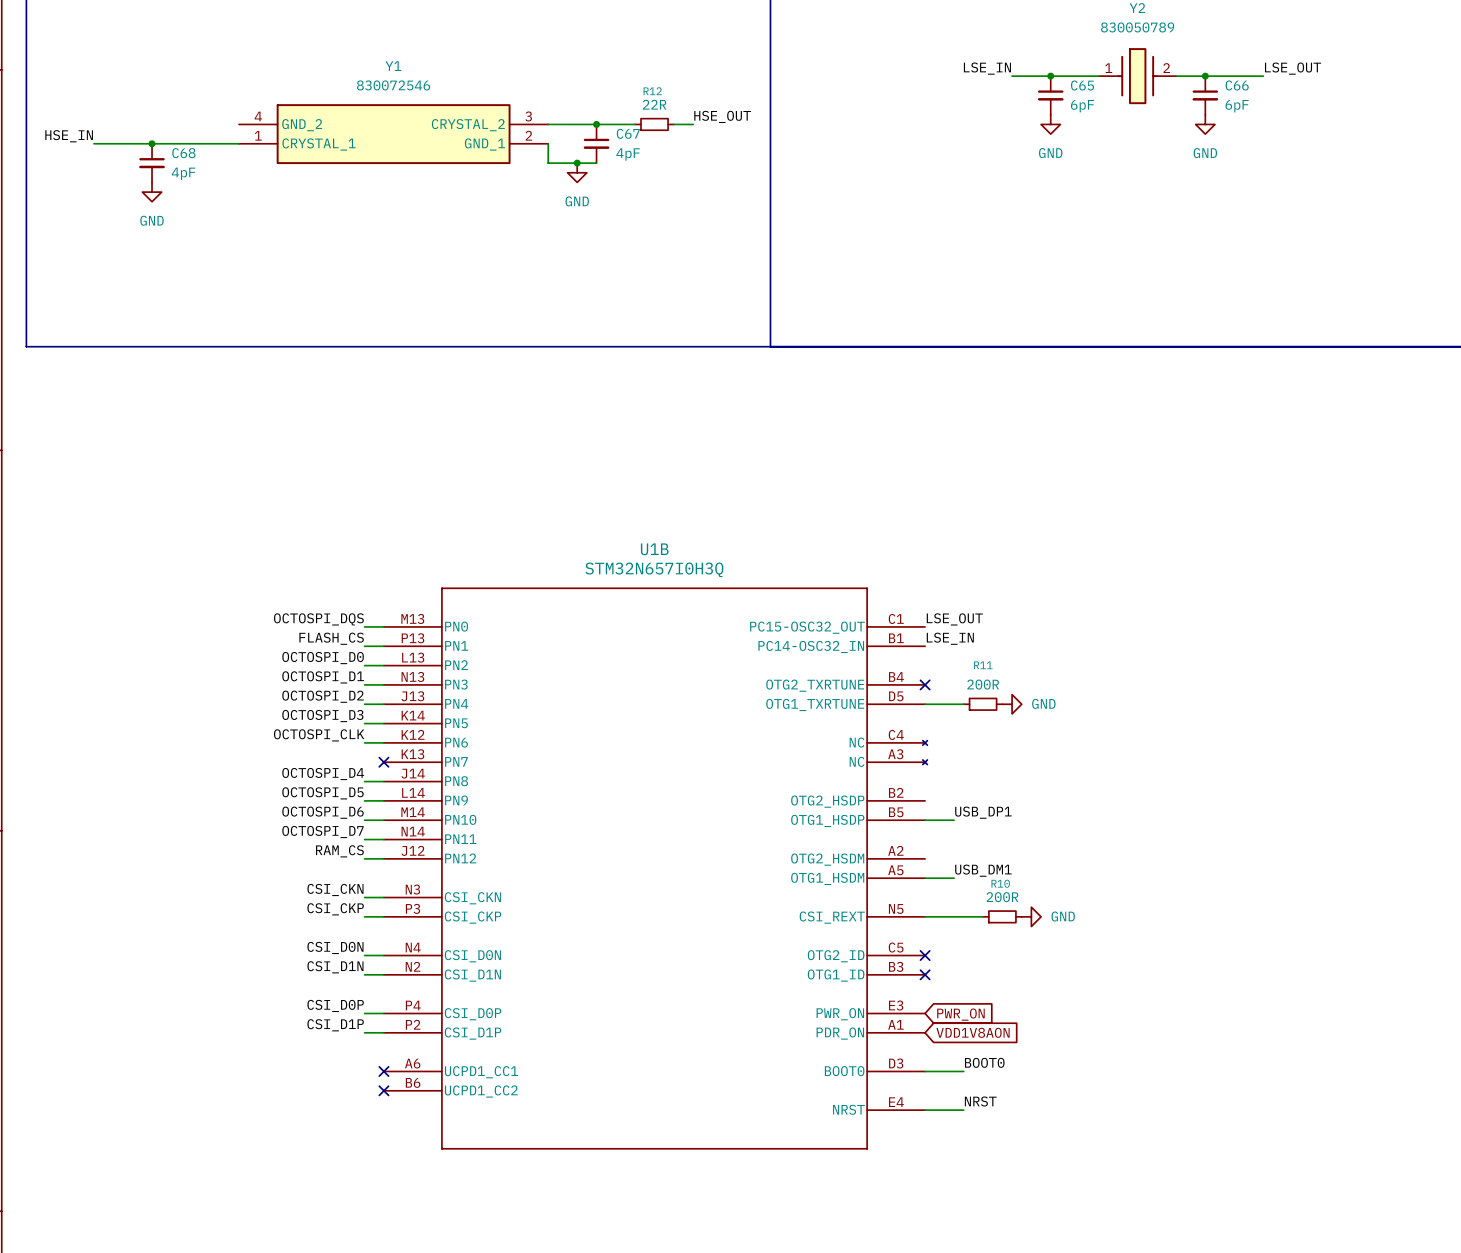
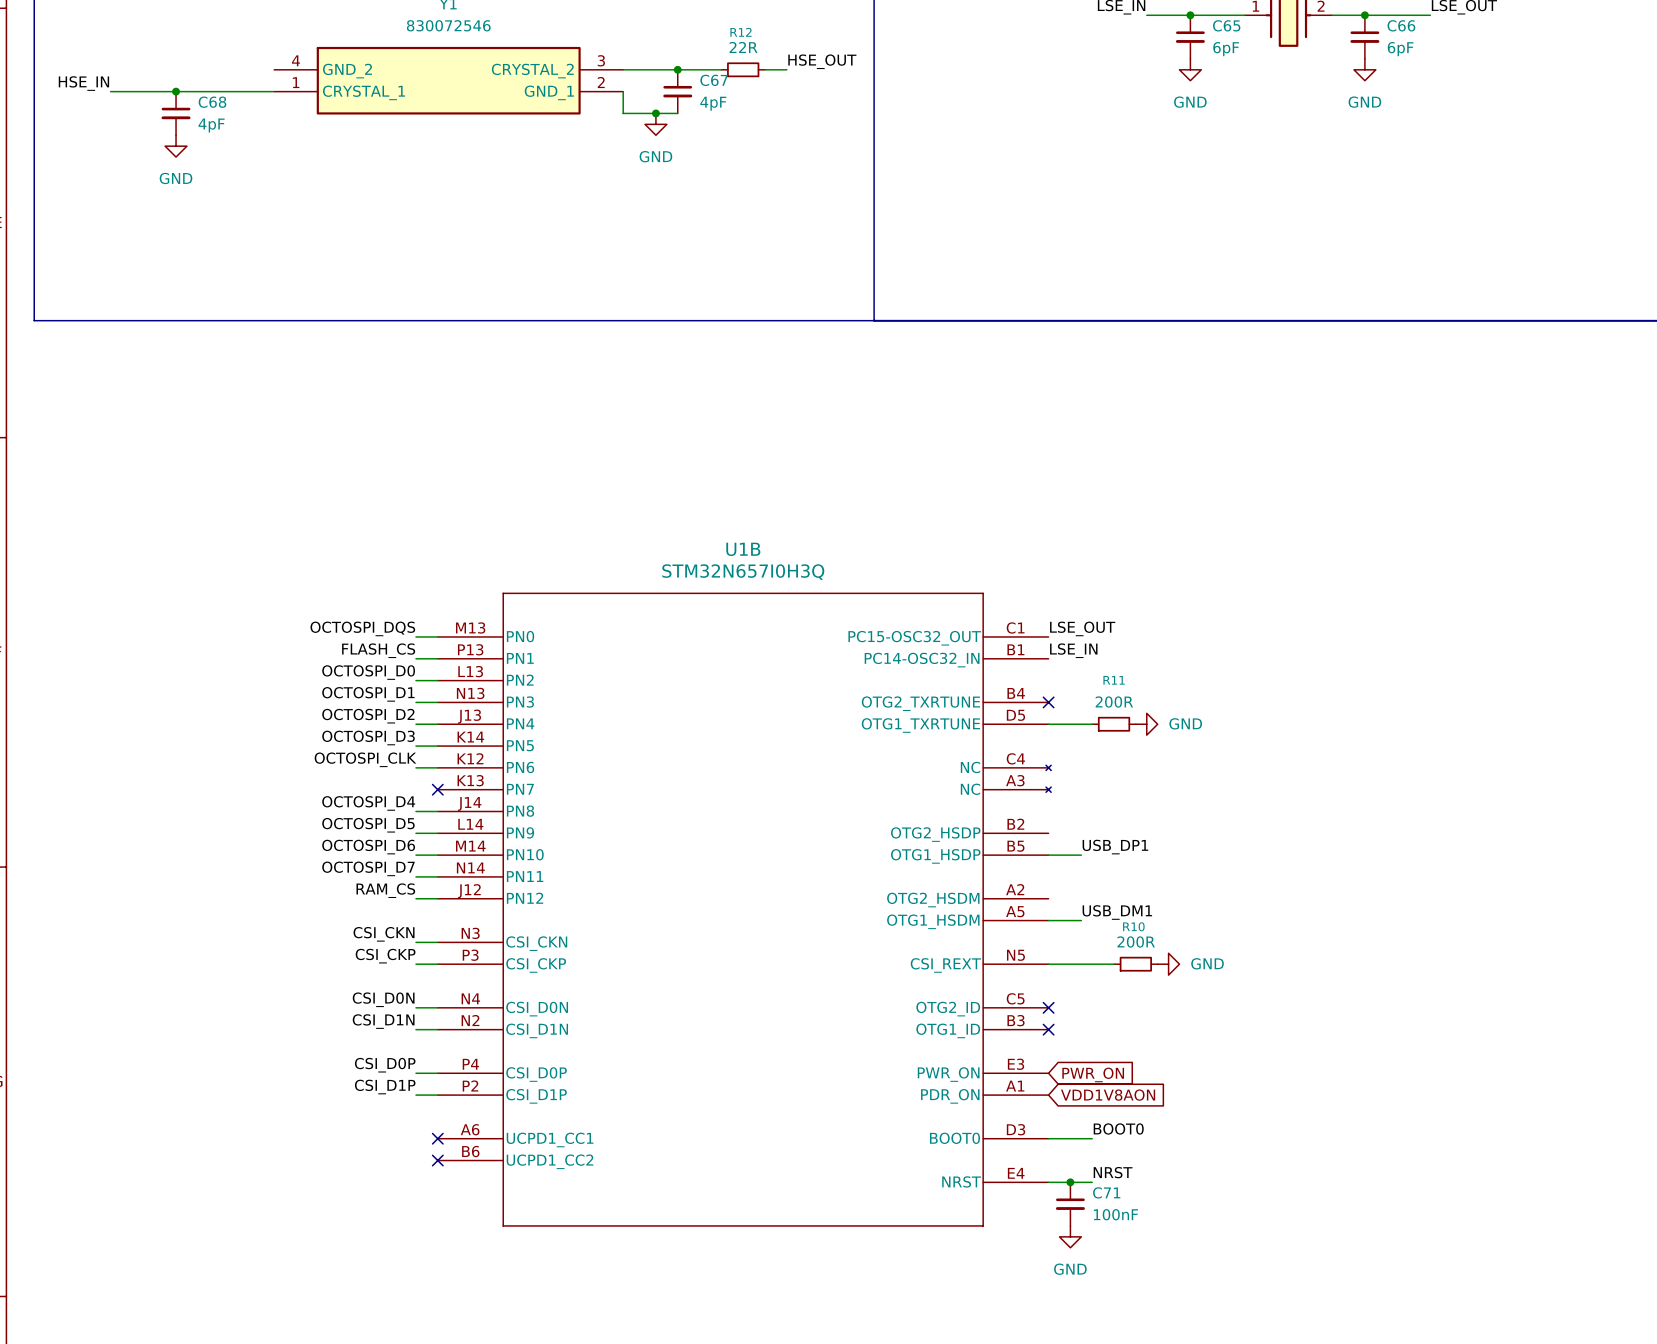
junction: none -> (1070, 1182)
C71: none -> 100nF (1070, 1204)
power symbol: none -> GND (1070, 1236)

